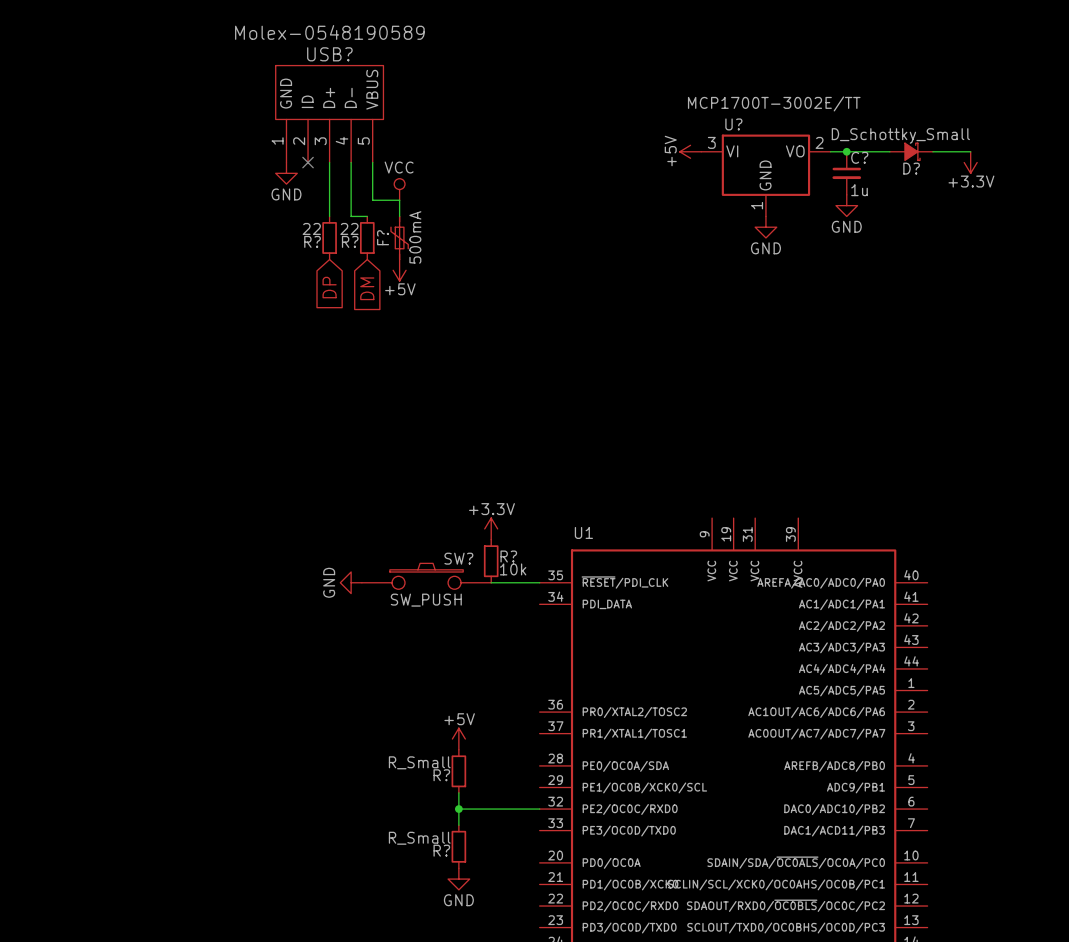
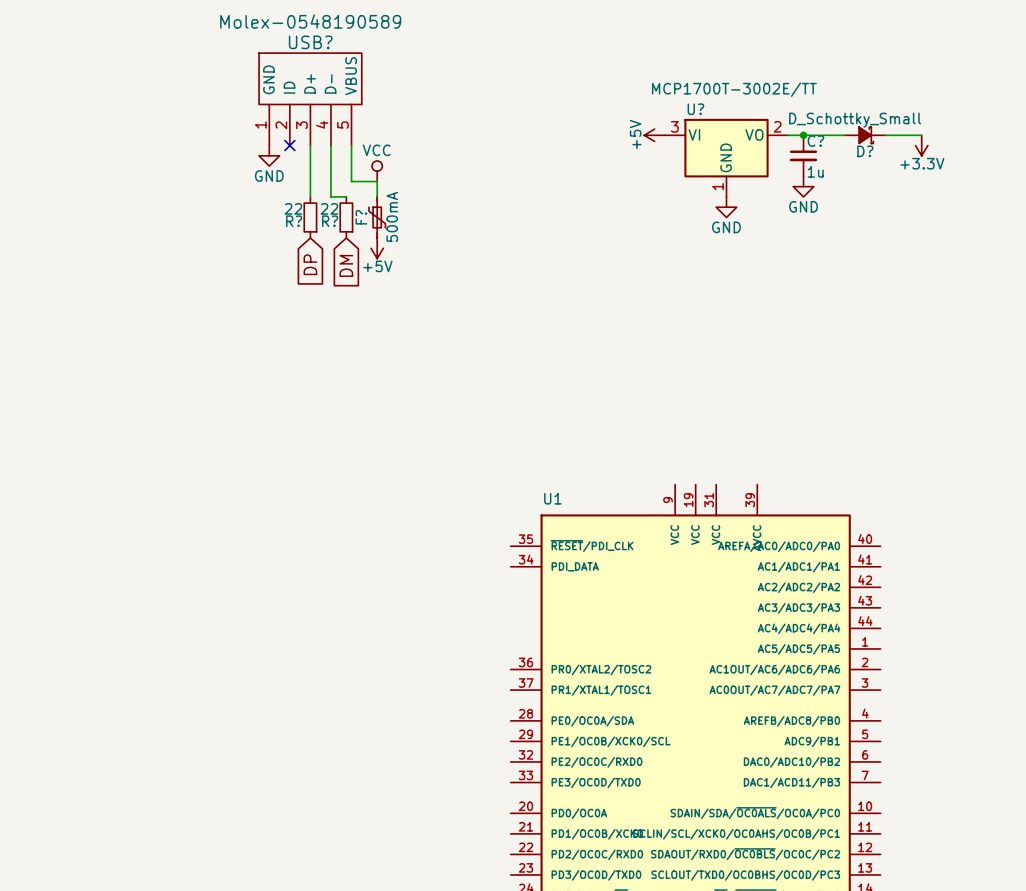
power symbol: +3.3V (491, 528) -> none
R?: 10k (491, 561) -> none
SW?: SW_PUSH (426, 576) -> none
power symbol: GND (351, 582) -> none
wire: (491, 582) (539, 582) -> none
power symbol: +5V (458, 739) -> none
R?: R_Small (458, 771) -> none
wire: (458, 792) (458, 825) -> none
wire: (458, 809) (539, 809) -> none
junction: (458, 809) -> none
R?: R_Small (458, 846) -> none
power symbol: GND (458, 879) -> none

